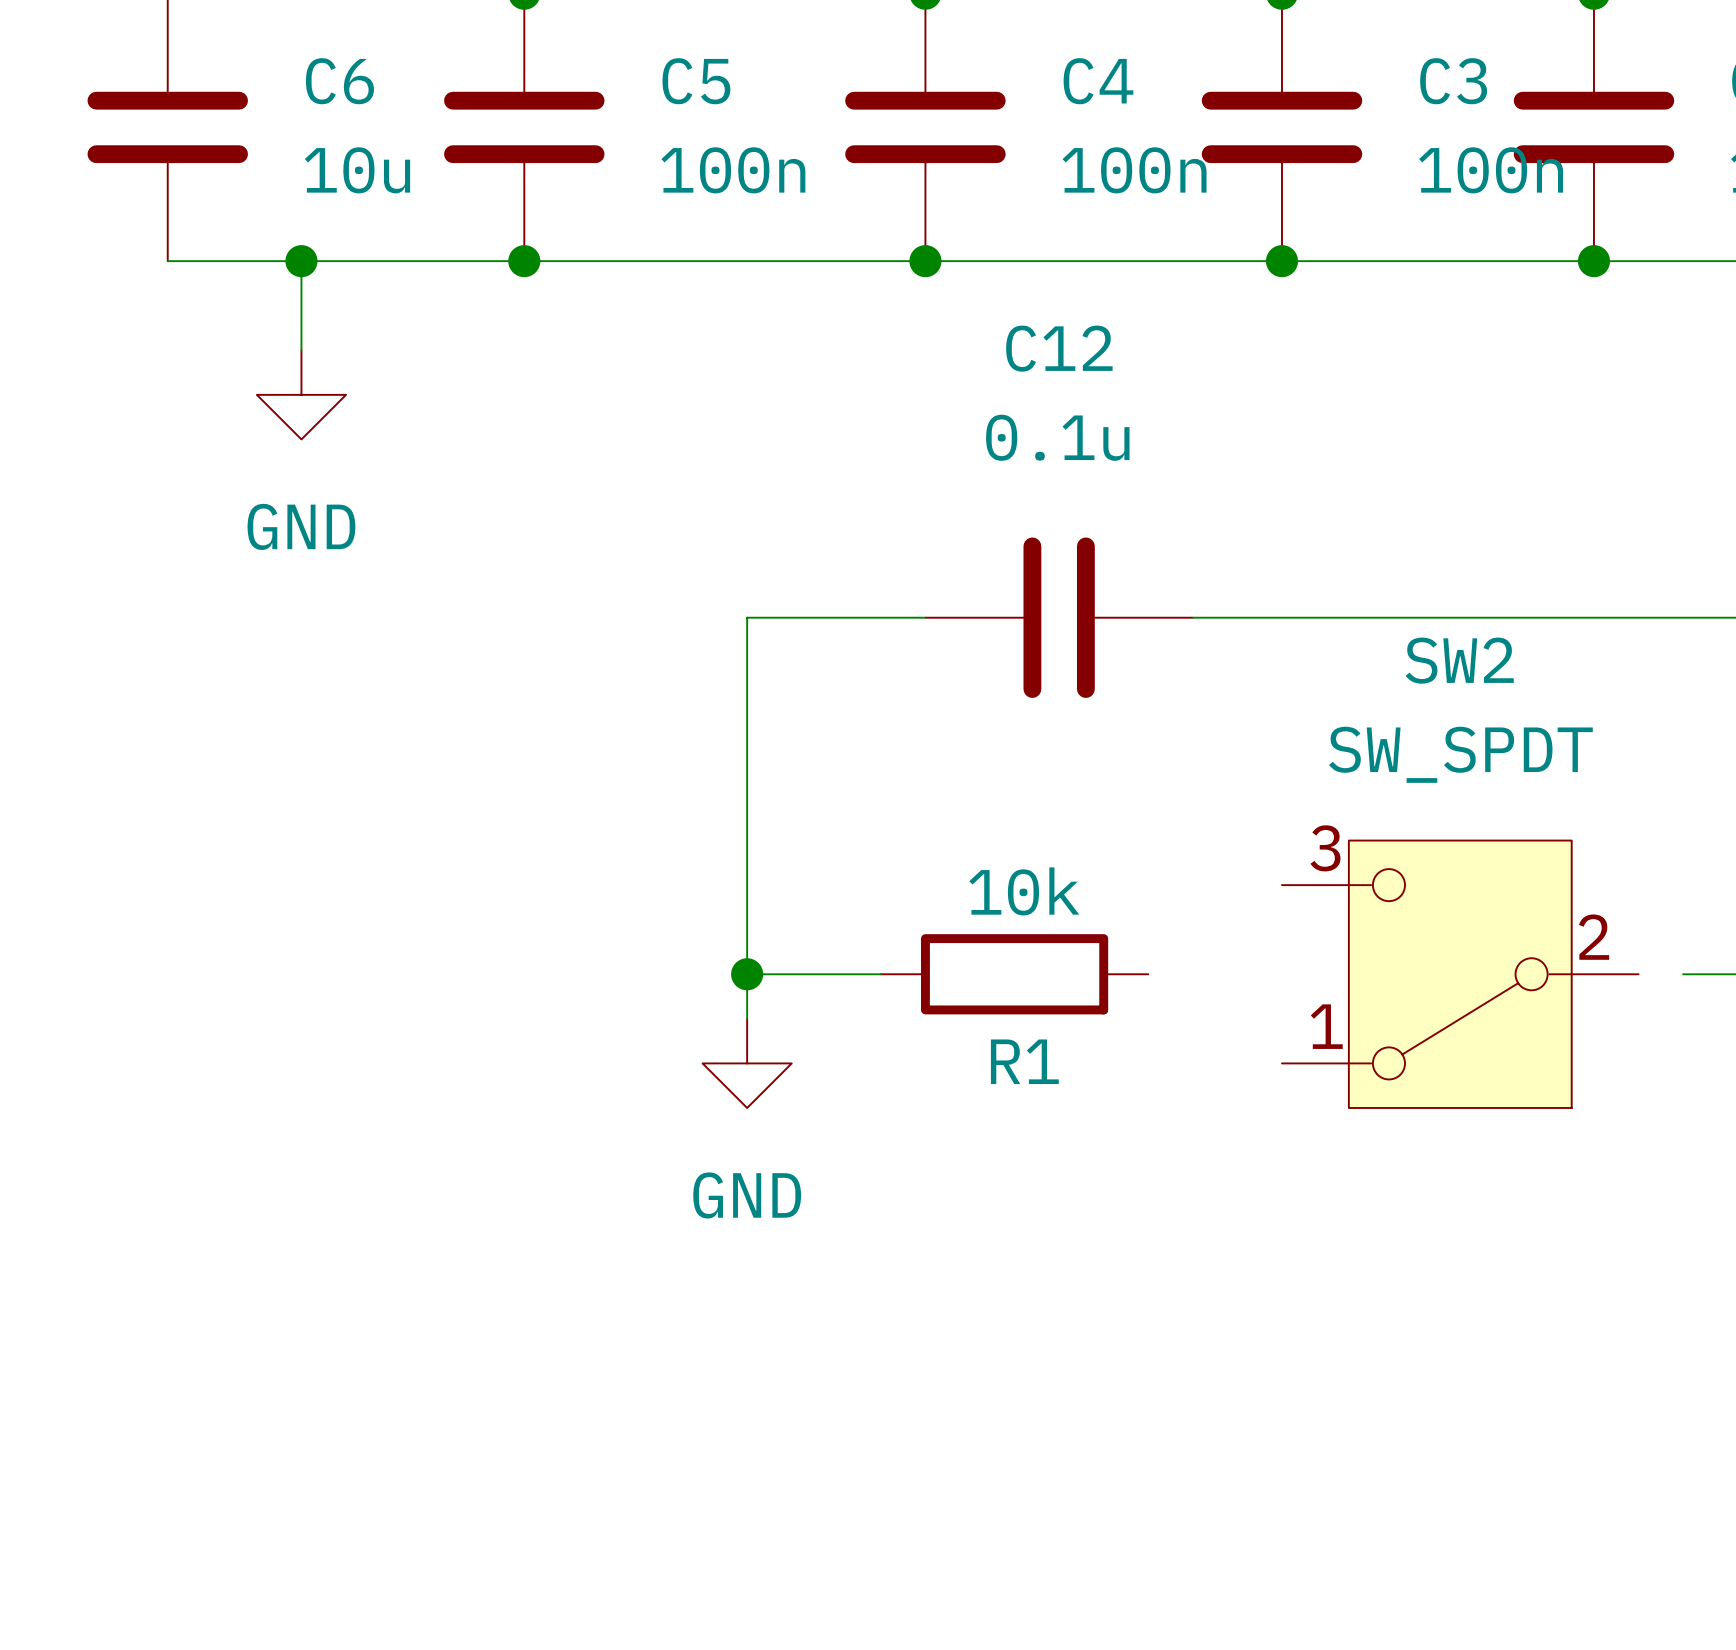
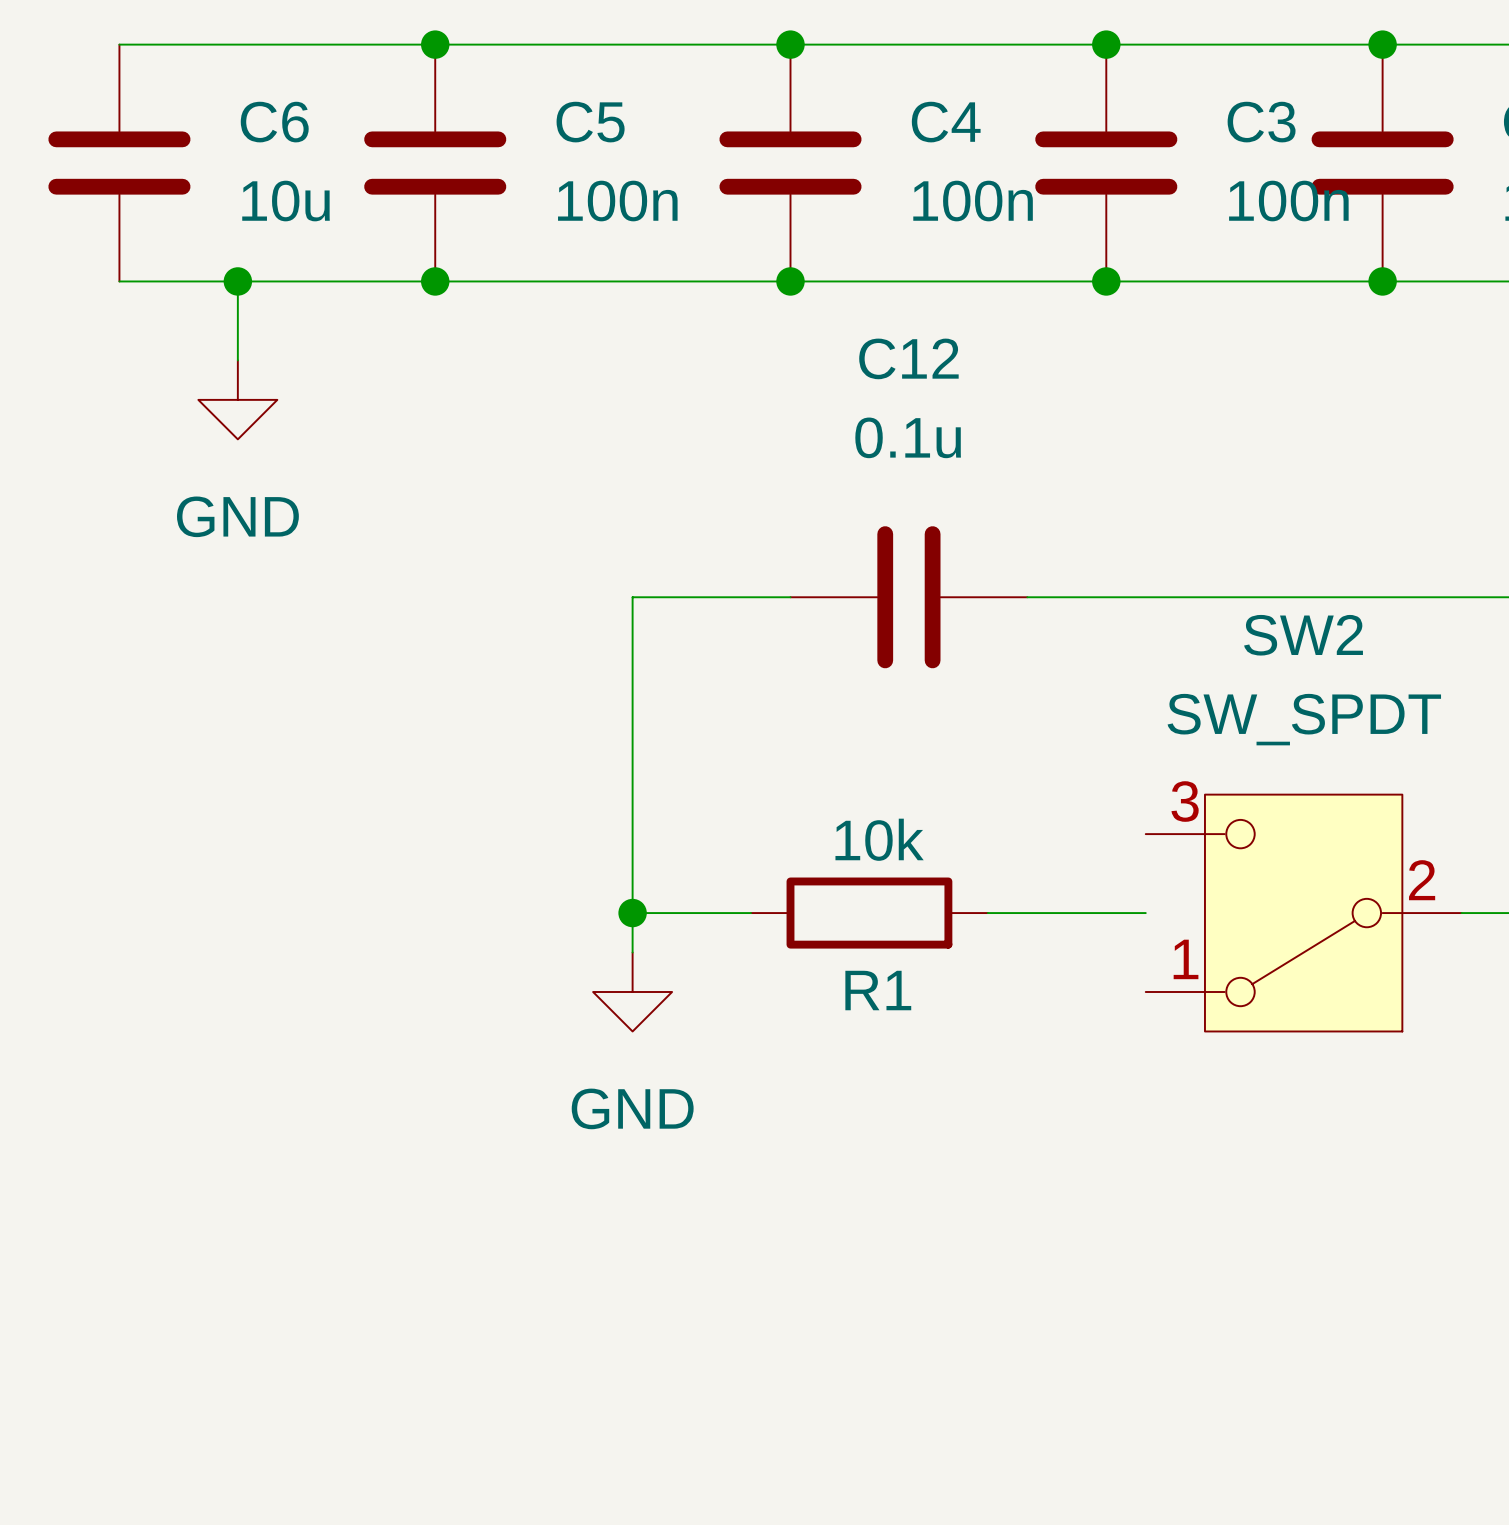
wire: none -> (987, 913) (1145, 913)
SW2 position: (1460, 974) -> (1303, 913)

